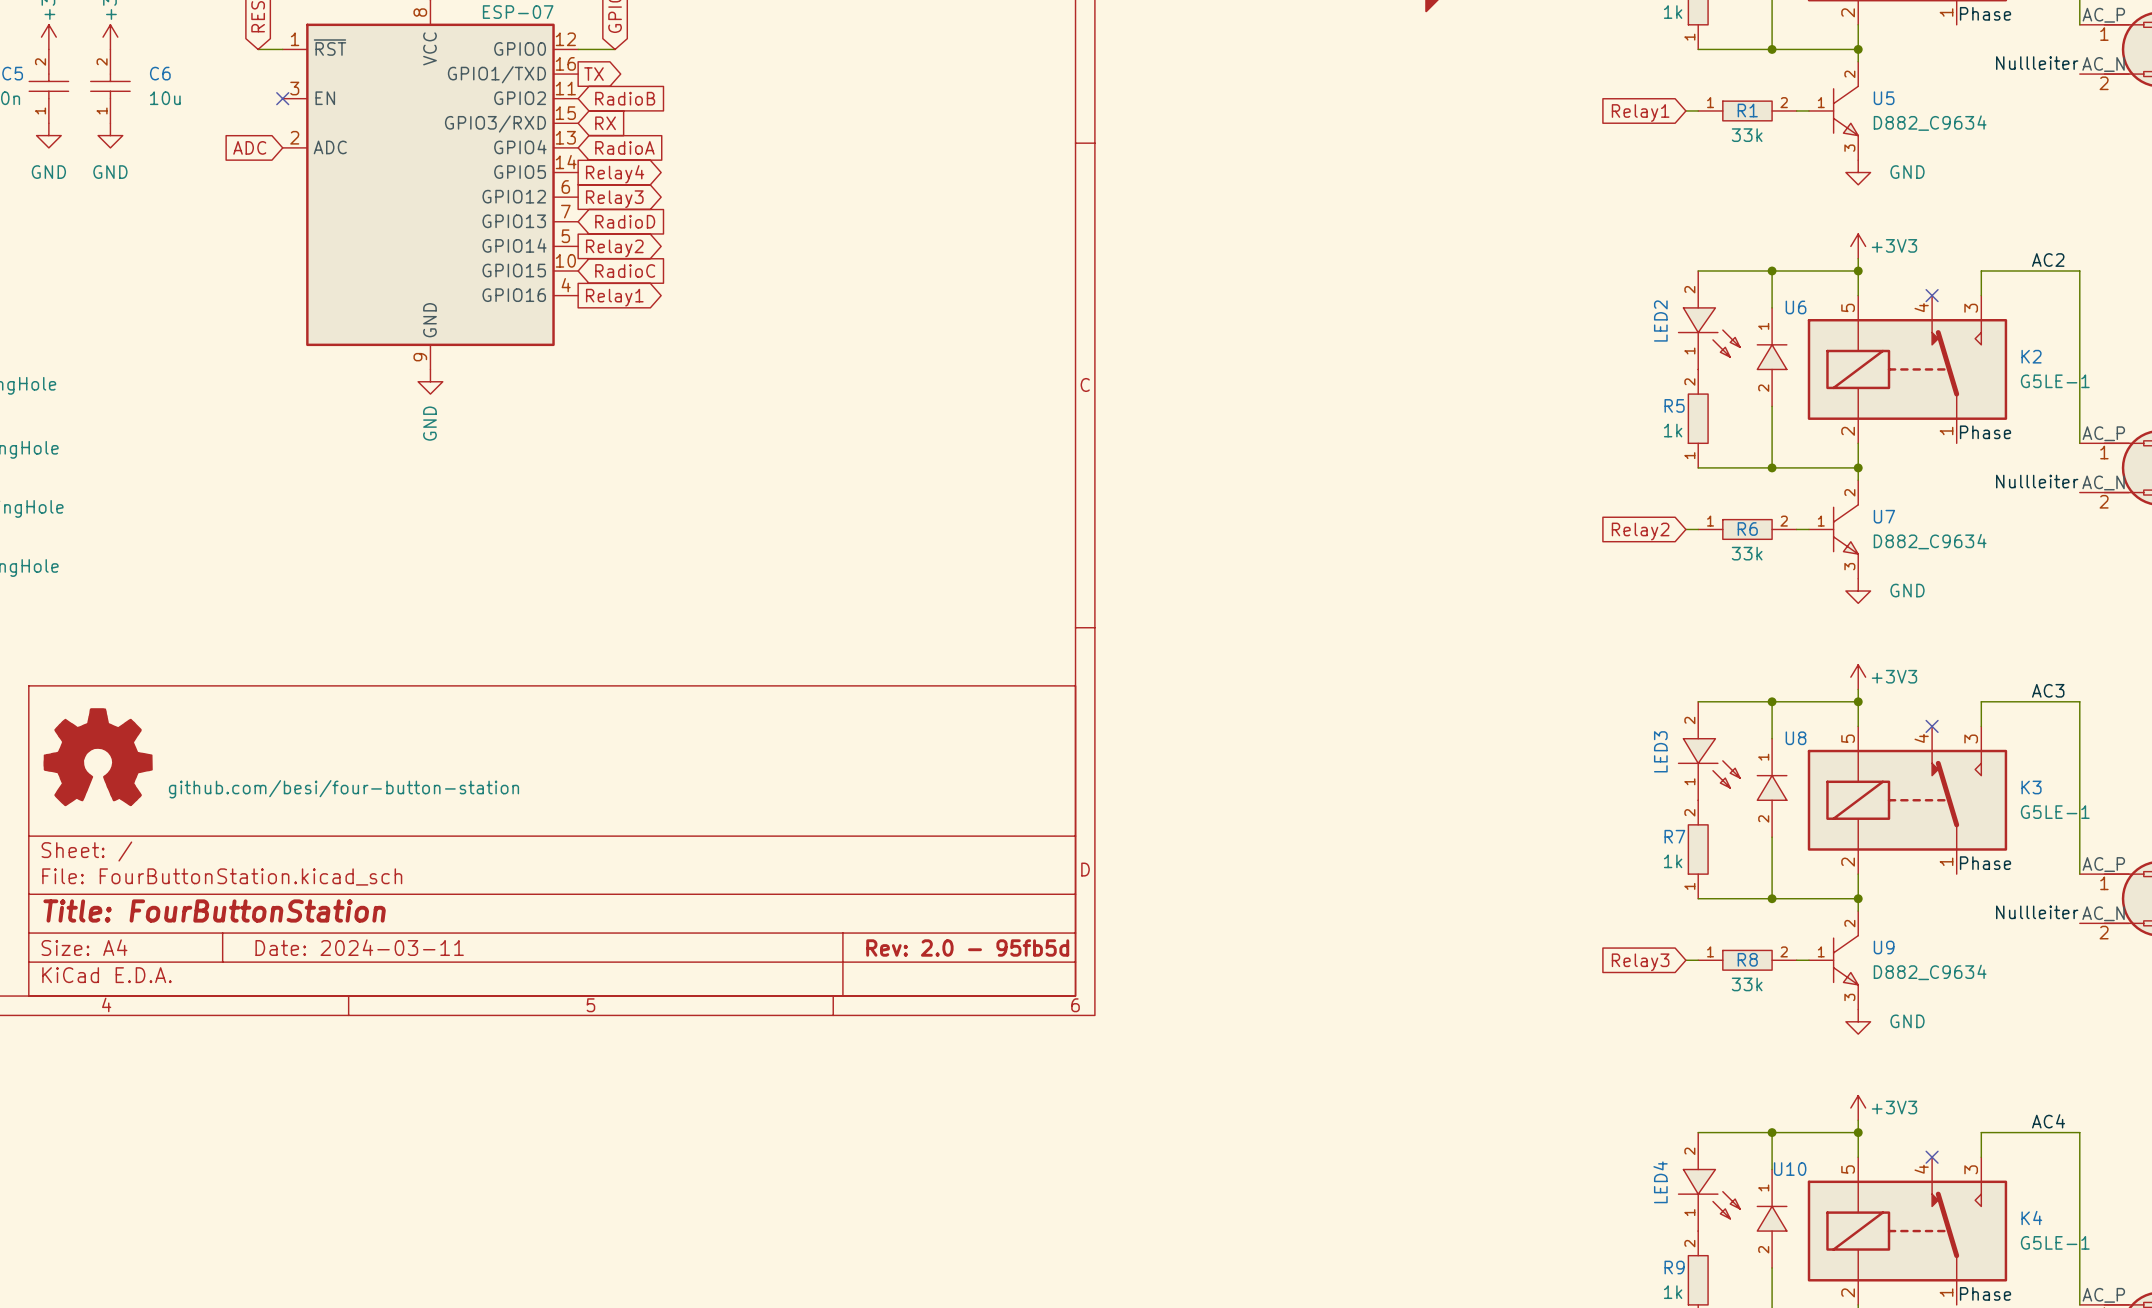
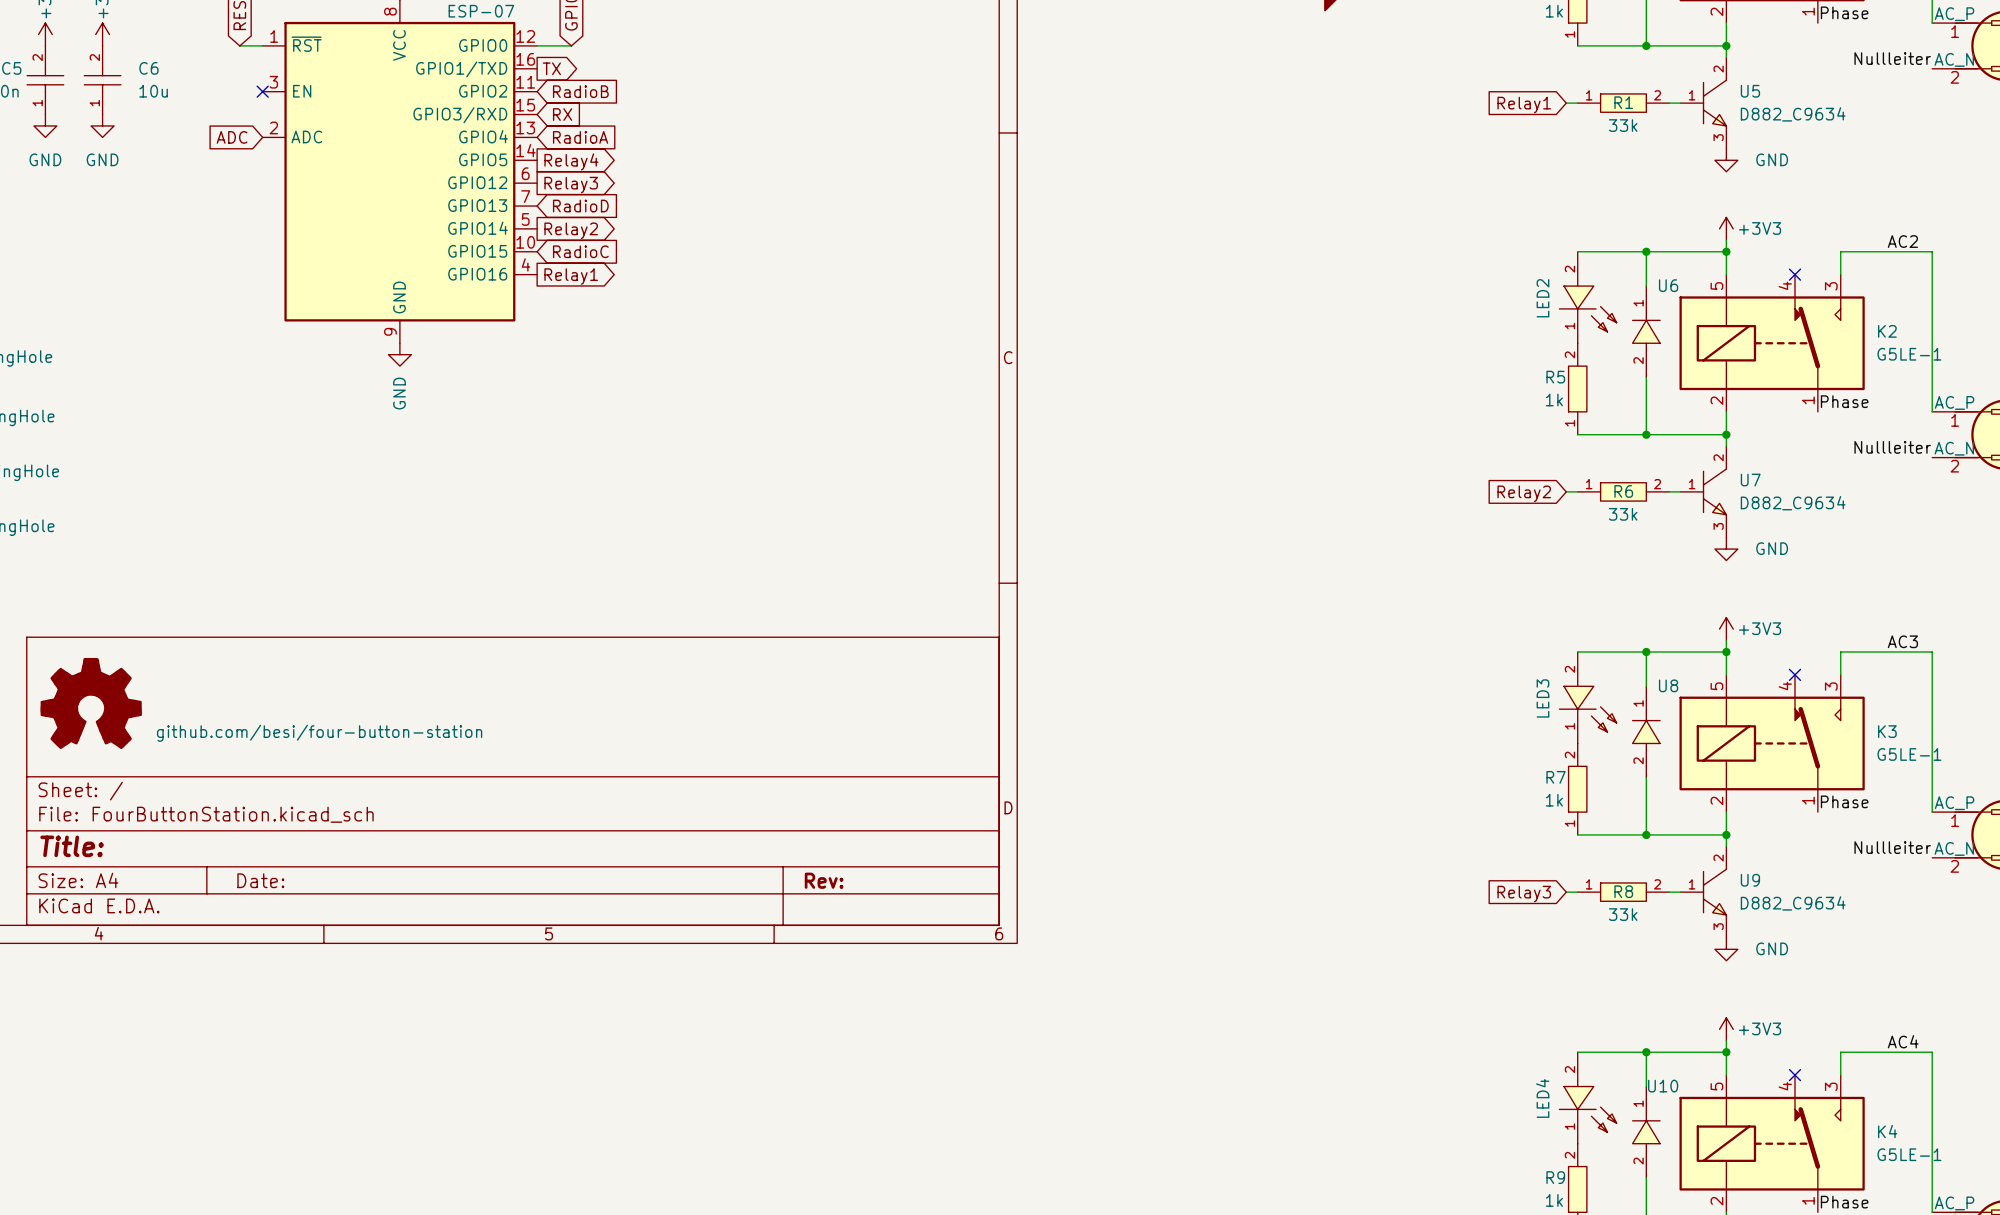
title block: Title: FourButtonStation (214, 910) -> Title: (72, 846)
title block: Date: 2024-03-11 (359, 947) -> Date: (260, 880)
title block: Rev: 2.0 - 95fb5d (967, 948) -> Rev: (824, 880)

